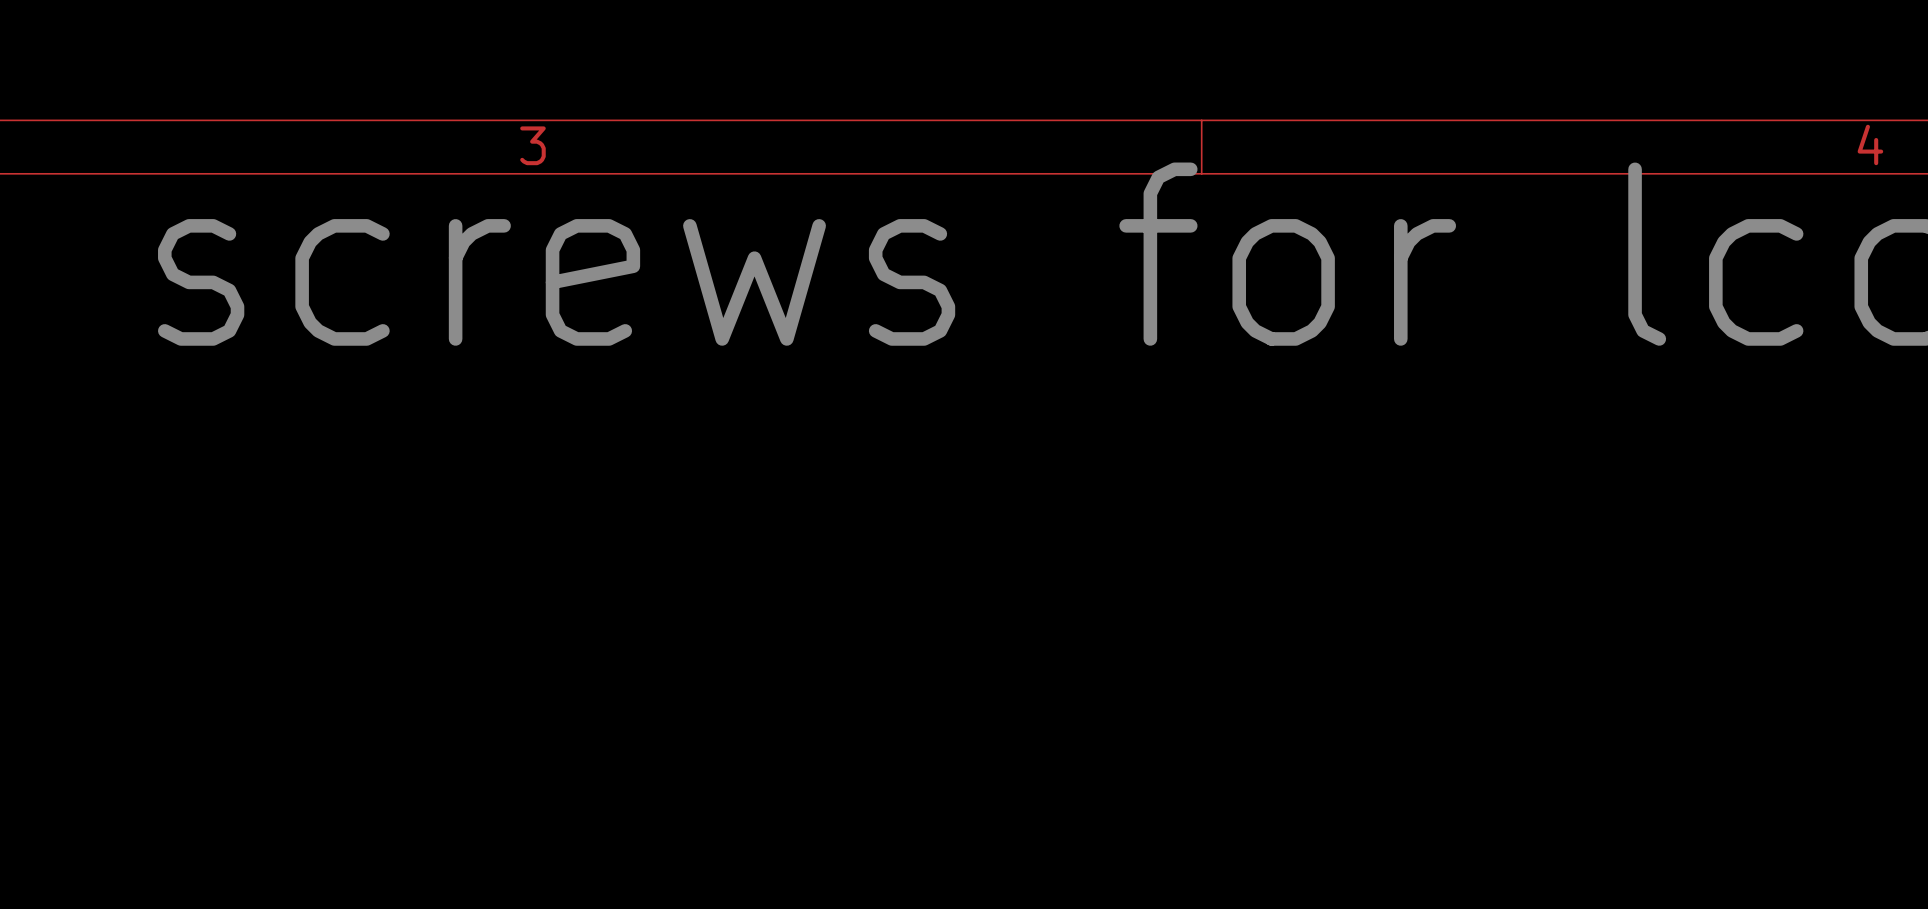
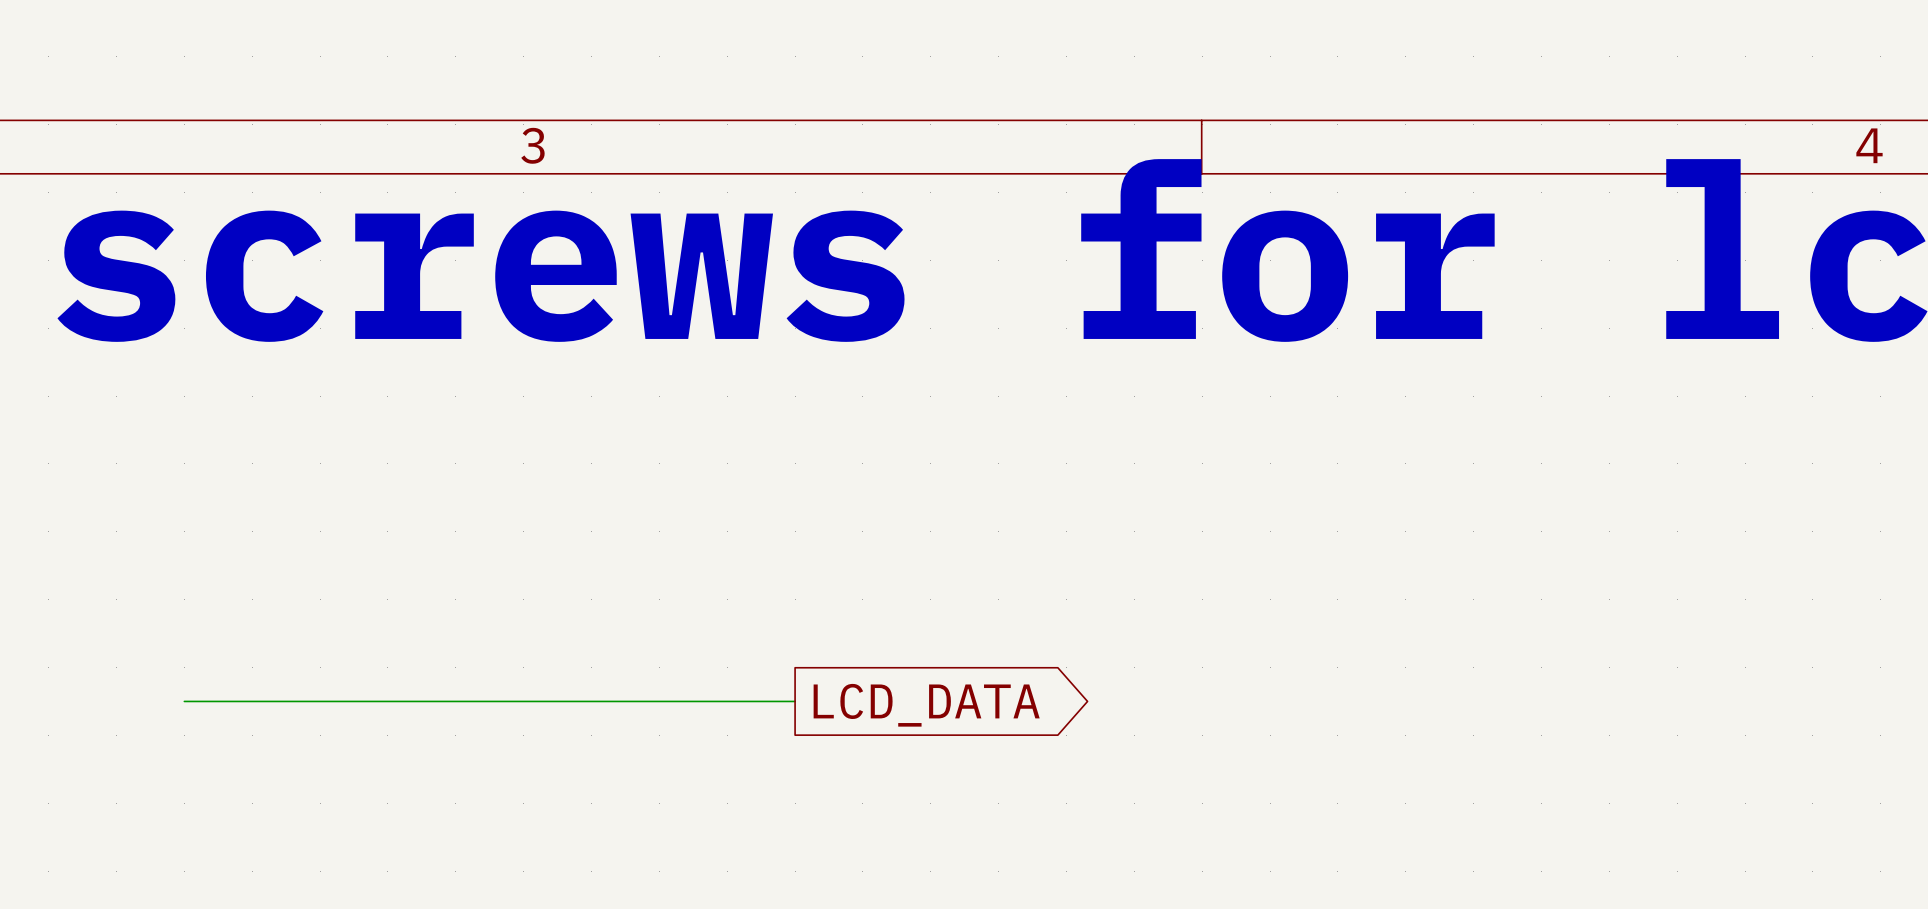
wire: none -> (184, 701) (795, 701)
global label: none -> LCD_DATA (926, 705)

